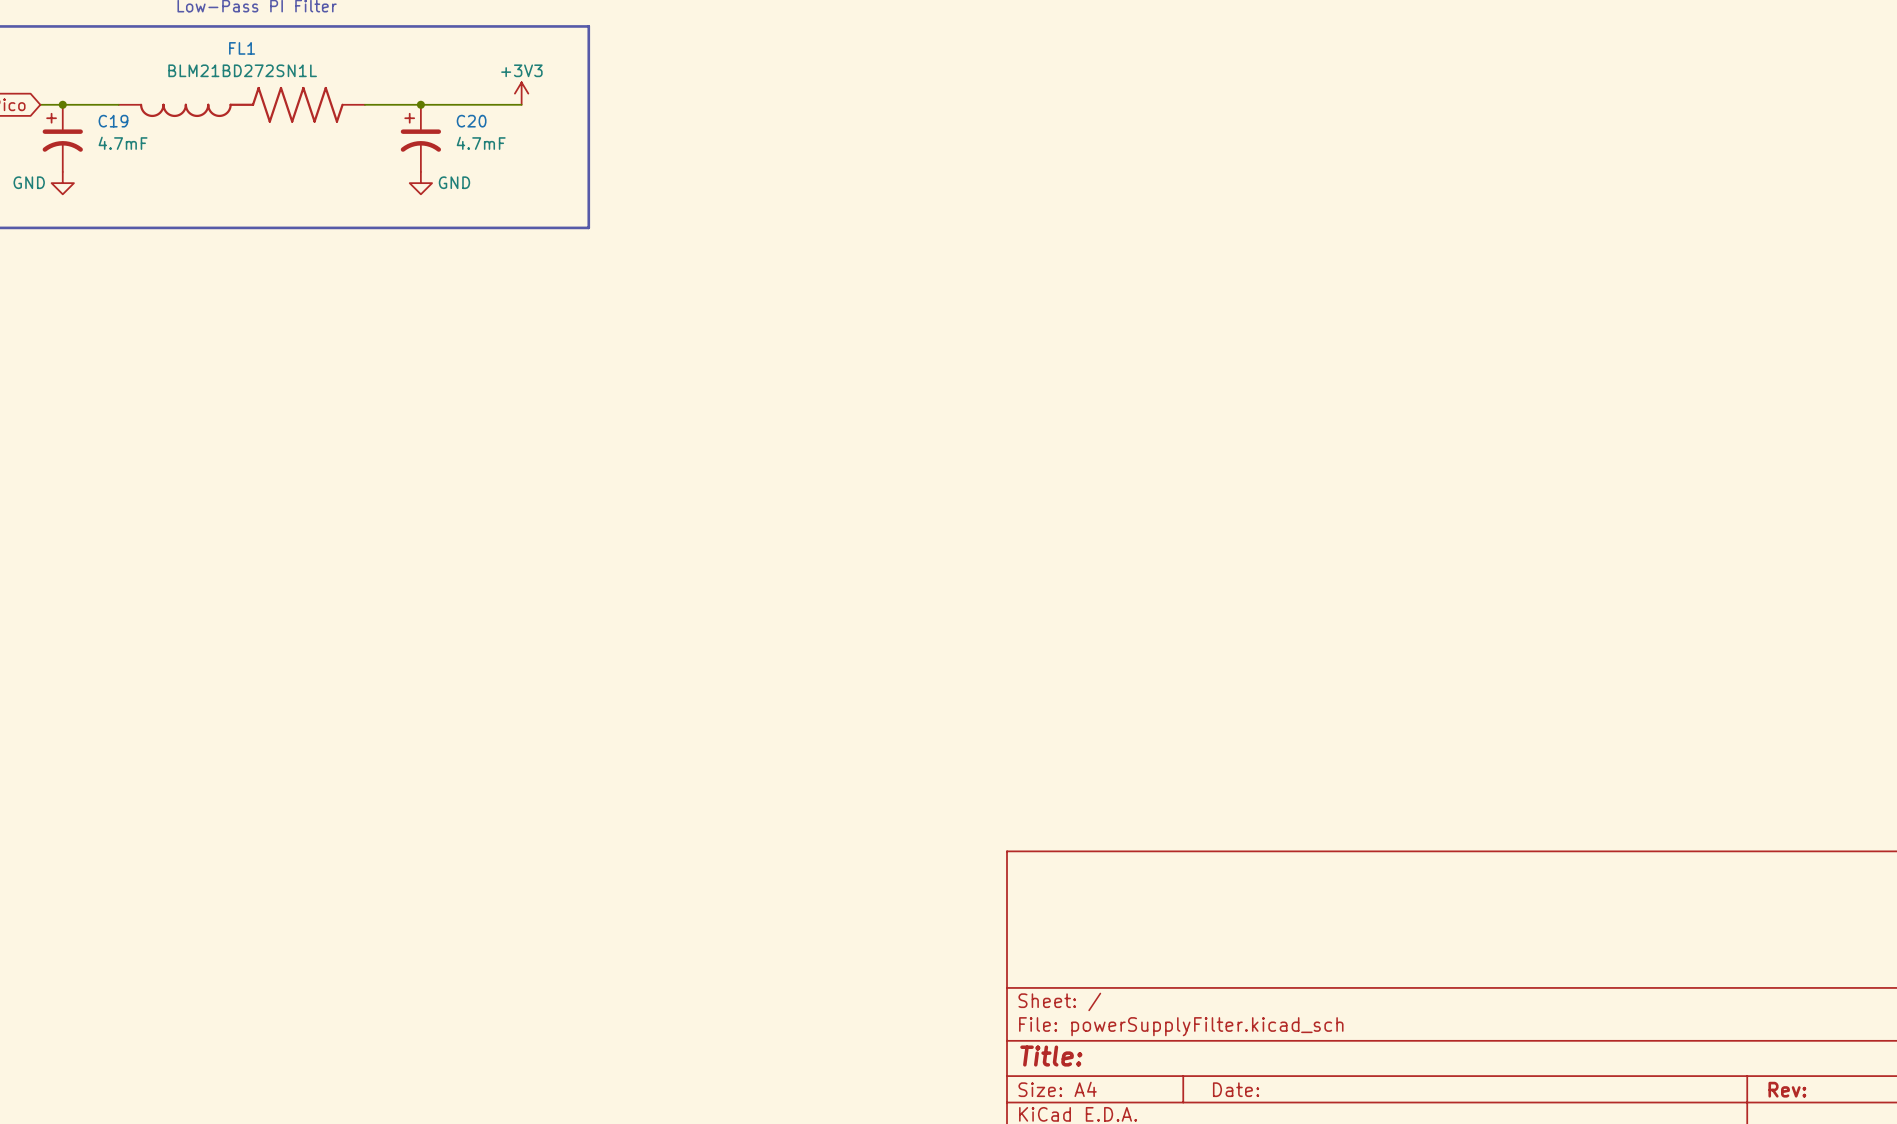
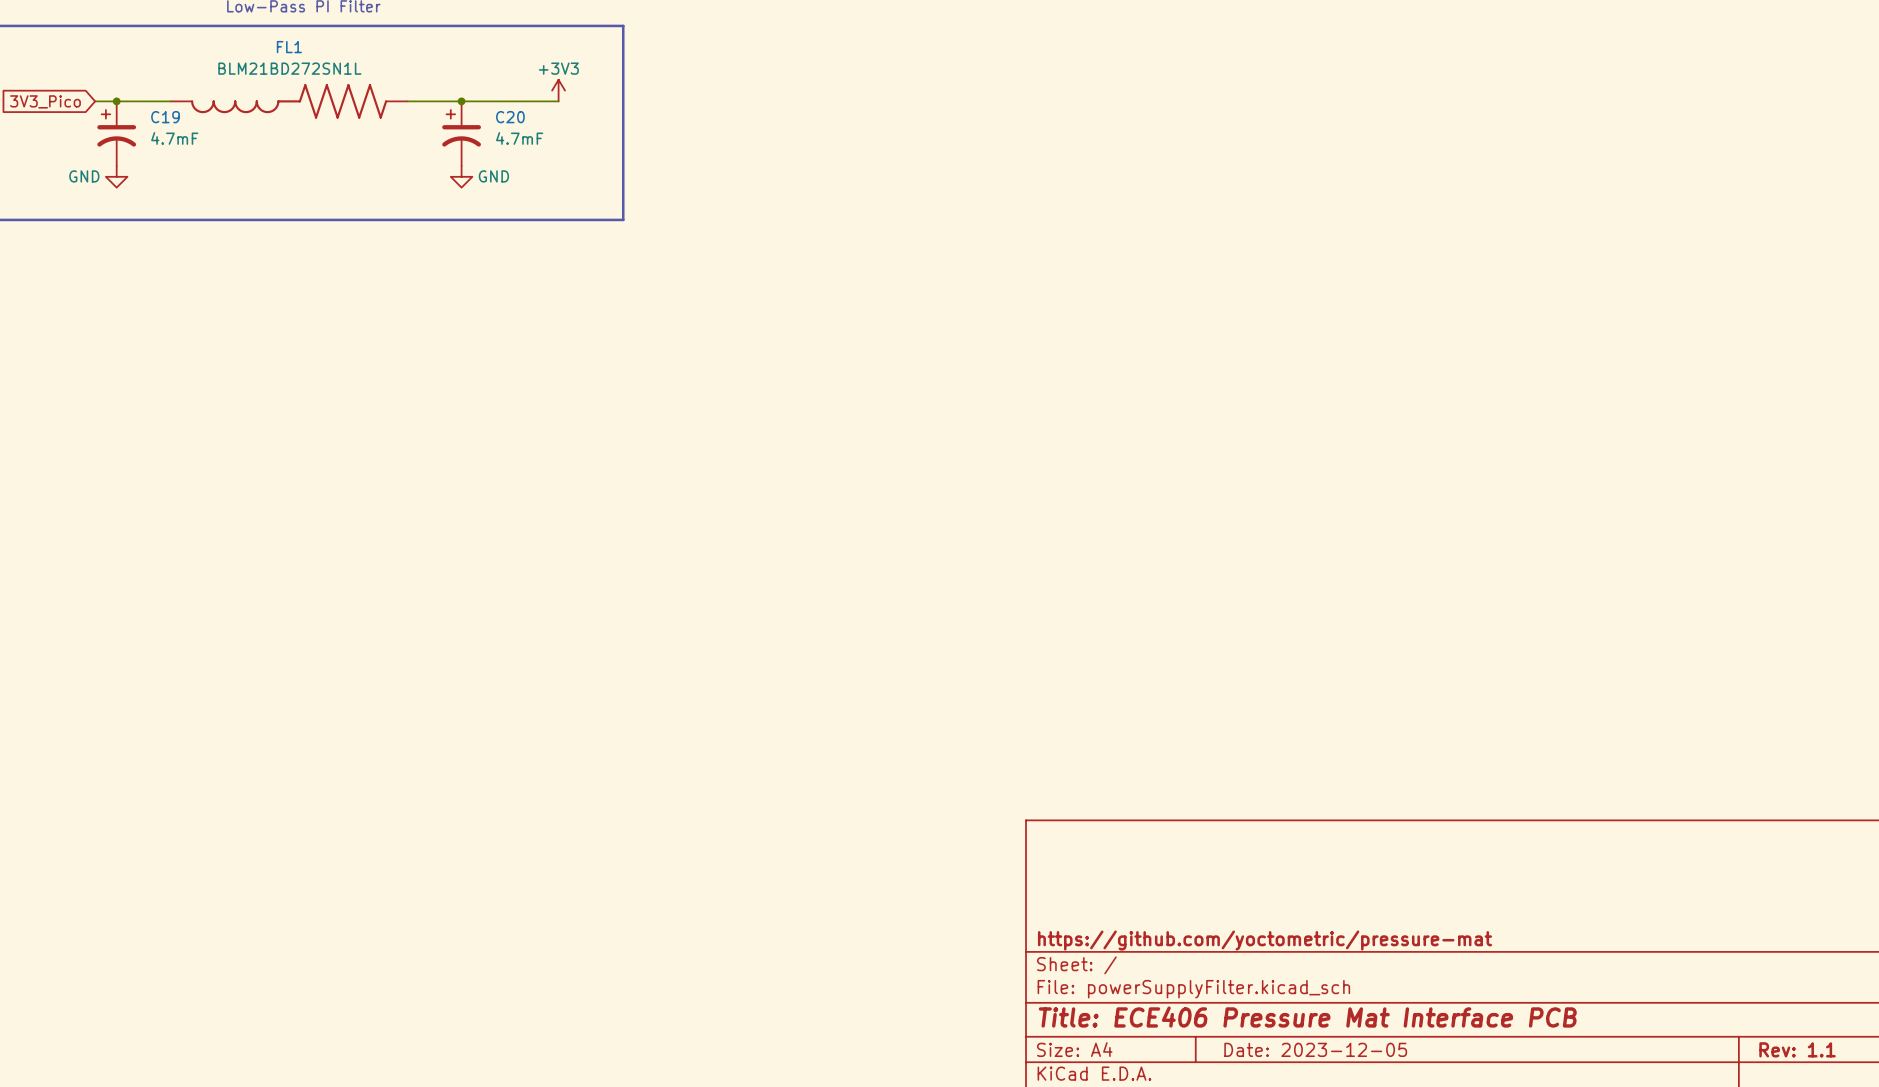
title block: none -> https://github.com/yoctometric/pressure-mat (1265, 940)
title block: Title: (1051, 1056) -> Title: ECE406 Pressure Mat Interface PCB (1307, 1017)
title block: Date: (1236, 1089) -> Date: 2023-12-05 (1315, 1049)
title block: Rev: (1787, 1089) -> Rev: 1.1 (1797, 1049)

